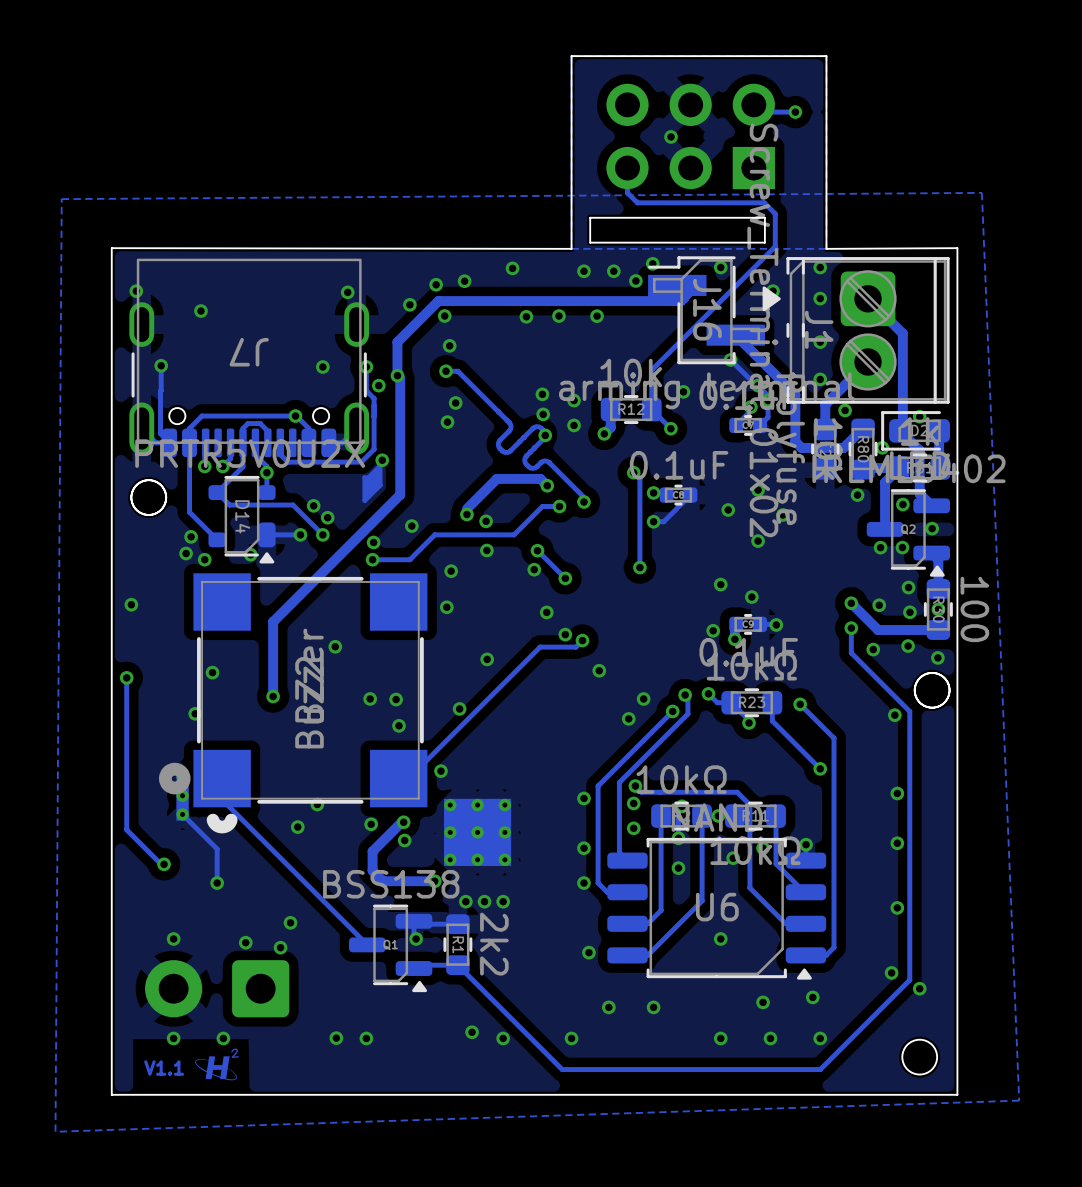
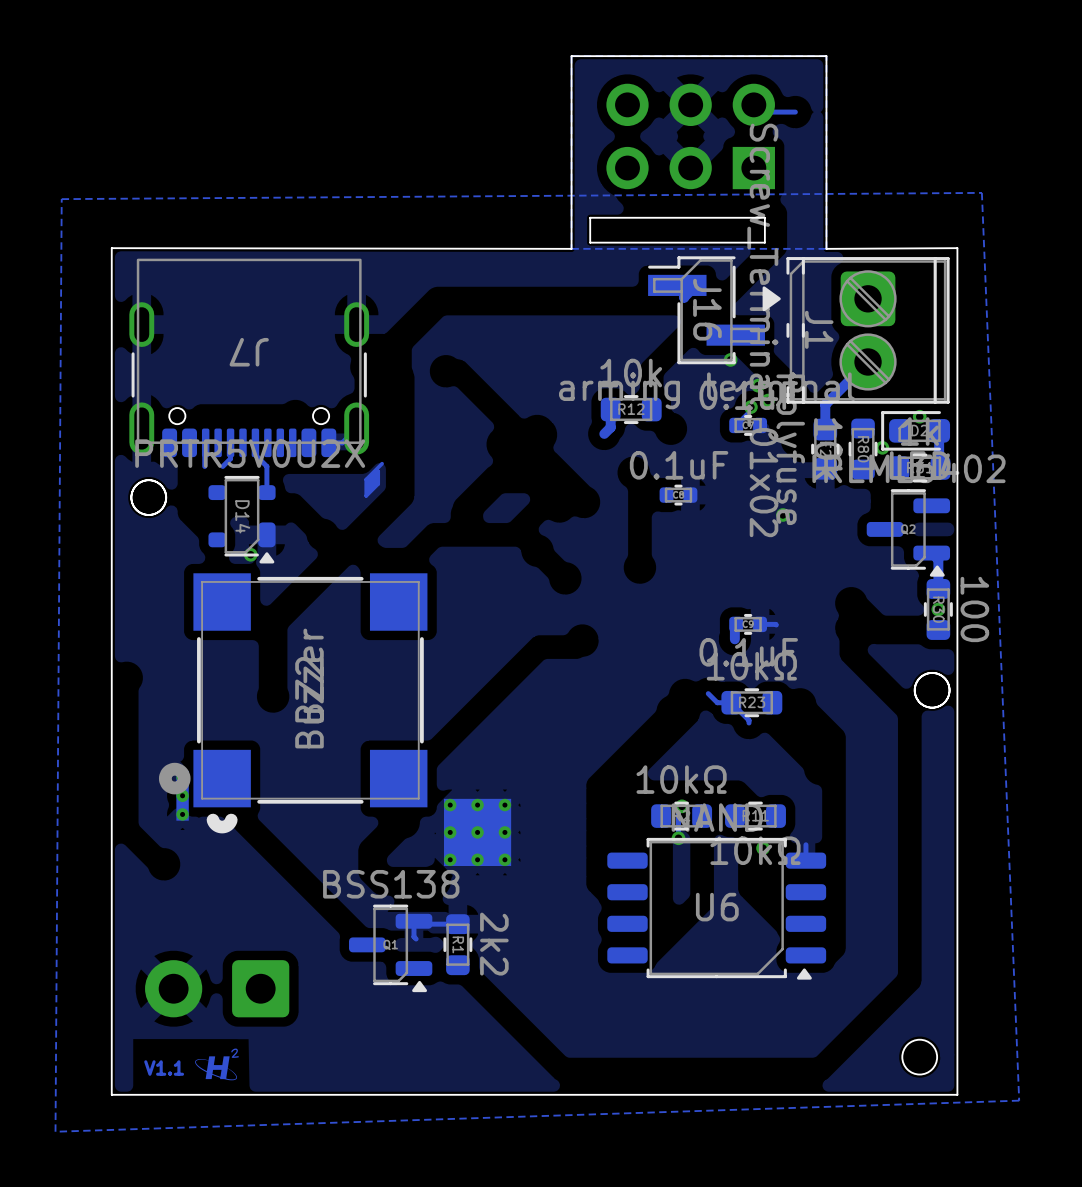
via: (795, 112) -> none
via: (671, 136) -> none
track: (627, 168) (627, 192) (637, 202) (764, 202) (775, 213) (775, 246) (651, 370) (651, 409) (670, 428) -> none
via: (652, 263) -> none
via: (720, 267) -> none
via: (820, 267) -> none
via: (512, 268) -> none
via: (583, 271) -> none
via: (613, 271) -> none
via: (635, 280) -> none
via: (464, 281) -> none
via: (436, 284) -> none
via: (136, 291) -> none
track: (677, 291) (684, 297) (681, 301) (438, 301) (397, 342) (397, 375) (400, 378) (400, 494) (273, 621) (273, 696) -> none
via: (772, 291) -> none
via: (347, 292) -> none
via: (820, 298) -> none
track: (868, 298) (902, 333) (902, 427) (899, 430) (919, 450) (919, 493) (931, 505) -> none
via: (409, 304) -> none
via: (200, 311) -> none
via: (444, 316) -> none
via: (526, 316) -> none
via: (558, 316) -> none
via: (597, 316) -> none
track: (735, 335) (795, 394) (795, 441) (801, 447) (843, 447) (863, 428) -> none
via: (820, 342) -> none
via: (449, 345) -> none
track: (730, 359) (768, 395) (768, 417) (760, 425) -> none
track: (161, 365) (160, 433) (169, 442) (156, 442) (141, 428) -> none
via: (161, 365) -> none
via: (322, 366) -> none
track: (366, 366) (366, 390) (374, 398) (374, 449) (361, 462) (287, 462) (280, 454) (280, 442) -> none
via: (366, 366) -> none
track: (446, 371) (457, 371) (509, 423) (510, 430) (498, 443) (499, 447) (503, 451) (510, 451) (534, 427) (541, 428) (544, 432) (544, 437) (526, 456) (525, 463) (533, 468) (542, 461) (548, 461) (583, 497) -> none
via: (446, 371) -> none
via: (397, 375) -> none
via: (820, 379) -> none
via: (378, 385) -> none
via: (683, 391) -> none
via: (542, 394) -> none
via: (574, 400) -> none
via: (455, 402) -> none
via: (845, 410) -> none
via: (543, 414) -> none
via: (295, 416) -> none
via: (447, 422) -> none
via: (574, 425) -> none
via: (670, 428) -> none
via: (604, 433) -> none
via: (545, 435) -> none
track: (267, 442) (267, 431) (260, 423) (247, 423) (242, 428) (242, 466) (217, 492) (229, 505) (293, 505) (322, 534) -> none
track: (308, 442) (308, 428) (296, 416) (202, 416) (189, 428) (189, 512) (217, 539) -> none
track: (382, 460) (382, 463) (368, 477) (364, 477) (364, 501) (380, 485) (380, 465) -> none
via: (382, 460) -> none
via: (204, 466) -> none
via: (222, 466) -> none
track: (863, 469) (899, 468) (885, 482) (885, 529) -> none
via: (266, 472) -> none
track: (633, 472) (639, 478) (639, 567) -> none
via: (633, 472) -> none
track: (547, 485) (540, 478) (496, 478) (466, 508) (466, 514) -> none
via: (547, 485) -> none
via: (758, 490) -> none
via: (653, 492) -> none
track: (690, 495) (663, 521) (651, 521) -> none
via: (857, 495) -> none
via: (583, 502) -> none
via: (902, 504) -> none
via: (313, 505) -> none
track: (559, 506) (542, 506) (514, 534) (434, 534) (409, 559) (372, 559) -> none
via: (559, 506) -> none
via: (728, 509) -> none
via: (466, 514) -> none
via: (327, 517) -> none
via: (486, 521) -> none
via: (653, 521) -> none
via: (411, 526) -> none
via: (932, 528) -> none
via: (300, 534) -> none
track: (304, 534) (266, 534) -> none
via: (322, 534) -> none
via: (191, 536) -> none
via: (758, 541) -> none
via: (373, 542) -> none
via: (880, 547) -> none
via: (902, 547) -> none
via: (486, 550) -> none
track: (537, 550) (565, 578) -> none
via: (537, 550) -> none
via: (186, 553) -> none
via: (204, 559) -> none
via: (372, 559) -> none
via: (639, 567) -> none
via: (534, 569) -> none
via: (451, 571) -> none
via: (565, 578) -> none
via: (720, 584) -> none
via: (908, 587) -> none
via: (751, 597) -> none
track: (851, 603) (878, 629) (938, 629) -> none
via: (851, 603) -> none
via: (131, 604) -> none
via: (879, 605) -> none
via: (446, 607) -> none
via: (546, 612) -> none
via: (909, 612) -> none
via: (776, 624) -> none
track: (851, 628) (851, 652) (909, 711) (909, 980) (820, 1069) (562, 1069) (457, 965) (417, 965) -> none
via: (851, 628) -> none
via: (713, 630) -> none
via: (565, 634) -> none
via: (734, 639) -> none
track: (582, 640) (575, 647) (540, 647) (408, 778) (398, 778) -> none
via: (582, 640) -> none
via: (335, 646) -> none
via: (908, 646) -> none
via: (873, 649) -> none
via: (937, 657) -> none
via: (487, 659) -> none
via: (599, 670) -> none
via: (212, 672) -> none
track: (126, 677) (126, 829) (161, 864) (164, 864) -> none
via: (126, 677) -> none
via: (708, 693) -> none
track: (685, 695) (687, 697) (687, 713) (619, 782) (619, 852) (627, 860) -> none
via: (685, 695) -> none
via: (273, 696) -> none
via: (370, 698) -> none
via: (396, 699) -> none
via: (643, 699) -> none
track: (772, 702) (772, 721) (820, 768) -> none
track: (800, 704) (833, 738) (833, 947) (826, 955) (805, 955) -> none
via: (800, 704) -> none
via: (459, 708) -> none
track: (672, 711) (598, 786) (598, 883) (607, 892) (627, 892) -> none
via: (672, 711) -> none
via: (195, 713) -> none
via: (894, 715) -> none
via: (628, 718) -> none
via: (749, 722) -> none
via: (398, 725) -> none
via: (820, 768) -> none
via: (440, 771) -> none
track: (182, 777) (182, 814) (217, 849) (217, 883) -> none
track: (222, 778) (222, 799) (367, 944) -> none
track: (635, 786) (641, 792) (737, 792) (749, 804) (749, 888) (785, 923) (805, 923) -> none
via: (635, 786) -> none
via: (897, 793) -> none
via: (583, 798) -> none
via: (633, 803) -> none
via: (317, 804) -> none
via: (718, 815) -> none
track: (661, 816) (661, 910) (647, 923) (627, 923) -> none
track: (734, 816) (702, 816) (702, 900) (647, 955) (627, 955) -> none
track: (776, 816) (776, 863) (805, 892) -> none
track: (403, 822) (372, 851) (372, 870) (383, 881) (434, 881) -> none
via: (403, 822) -> none
via: (371, 824) -> none
via: (297, 827) -> none
via: (633, 828) -> none
via: (404, 840) -> none
via: (897, 843) -> none
via: (806, 844) -> none
via: (583, 848) -> none
via: (733, 858) -> none
via: (164, 864) -> none
via: (678, 868) -> none
via: (434, 881) -> none
via: (217, 883) -> none
via: (583, 883) -> none
via: (465, 901) -> none
via: (484, 901) -> none
via: (503, 901) -> none
via: (897, 907) -> none
via: (290, 922) -> none
via: (173, 938) -> none
via: (416, 938) -> none
via: (720, 938) -> none
via: (245, 942) -> none
via: (280, 947) -> none
via: (588, 952) -> none
via: (891, 972) -> none
via: (919, 988) -> none
via: (812, 997) -> none
via: (763, 1002) -> none
via: (608, 1007) -> none
via: (653, 1007) -> none
via: (472, 1032) -> none
via: (173, 1038) -> none
via: (223, 1038) -> none
via: (336, 1038) -> none
via: (366, 1038) -> none
via: (503, 1038) -> none
via: (571, 1038) -> none
via: (720, 1038) -> none
via: (770, 1038) -> none
via: (820, 1038) -> none

